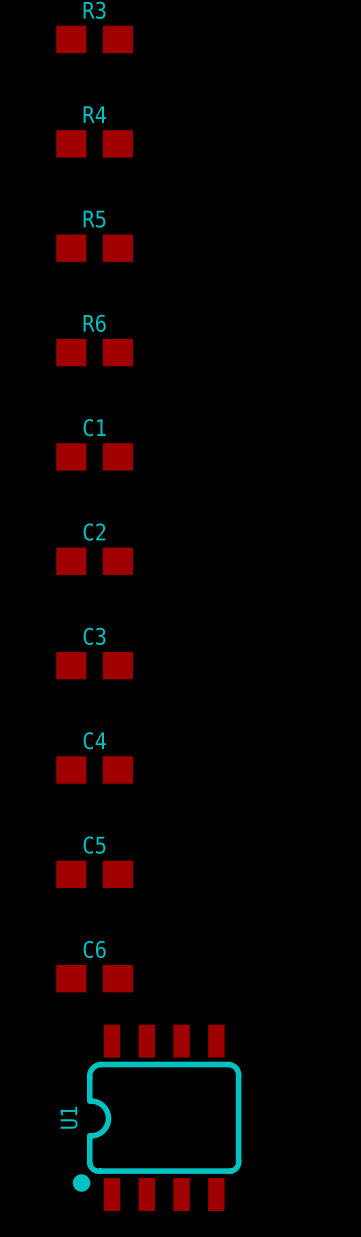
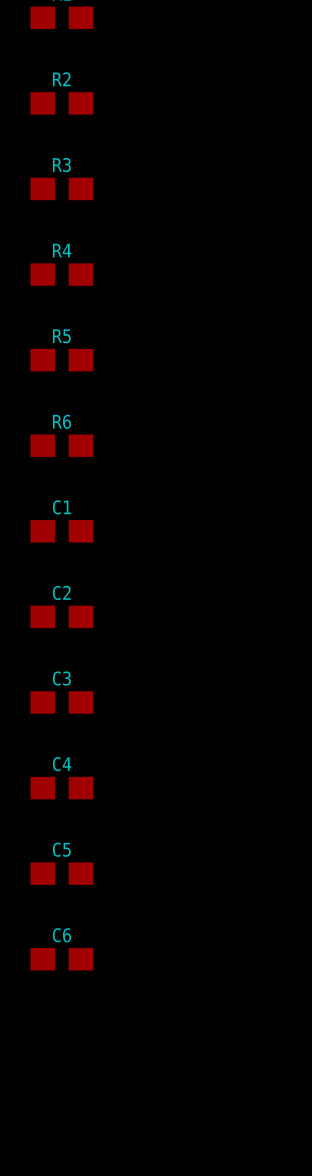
U1: (157, 1117) -> none

